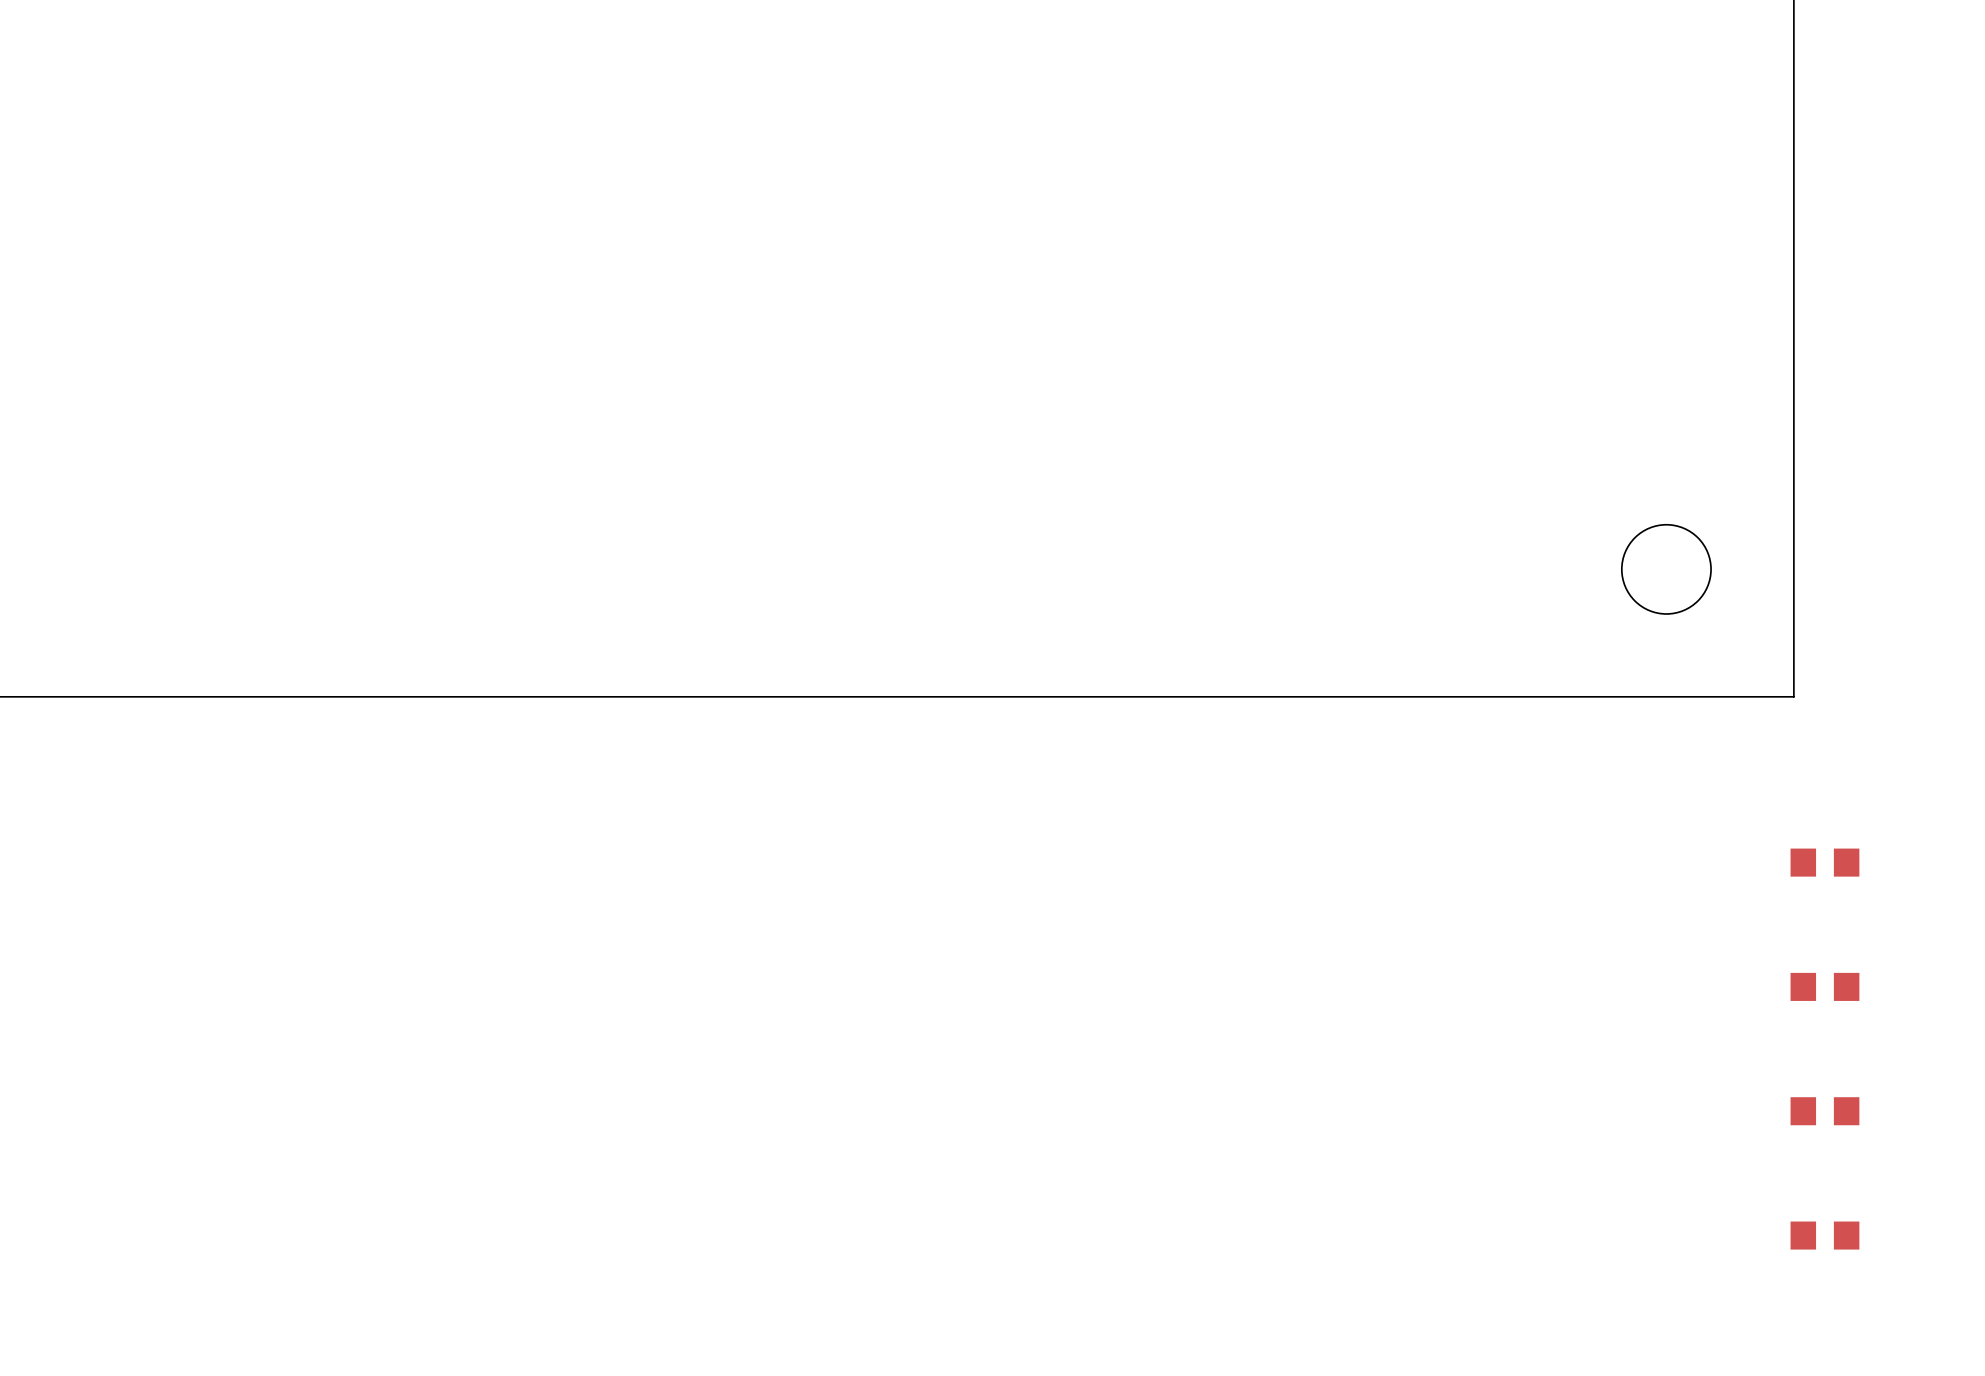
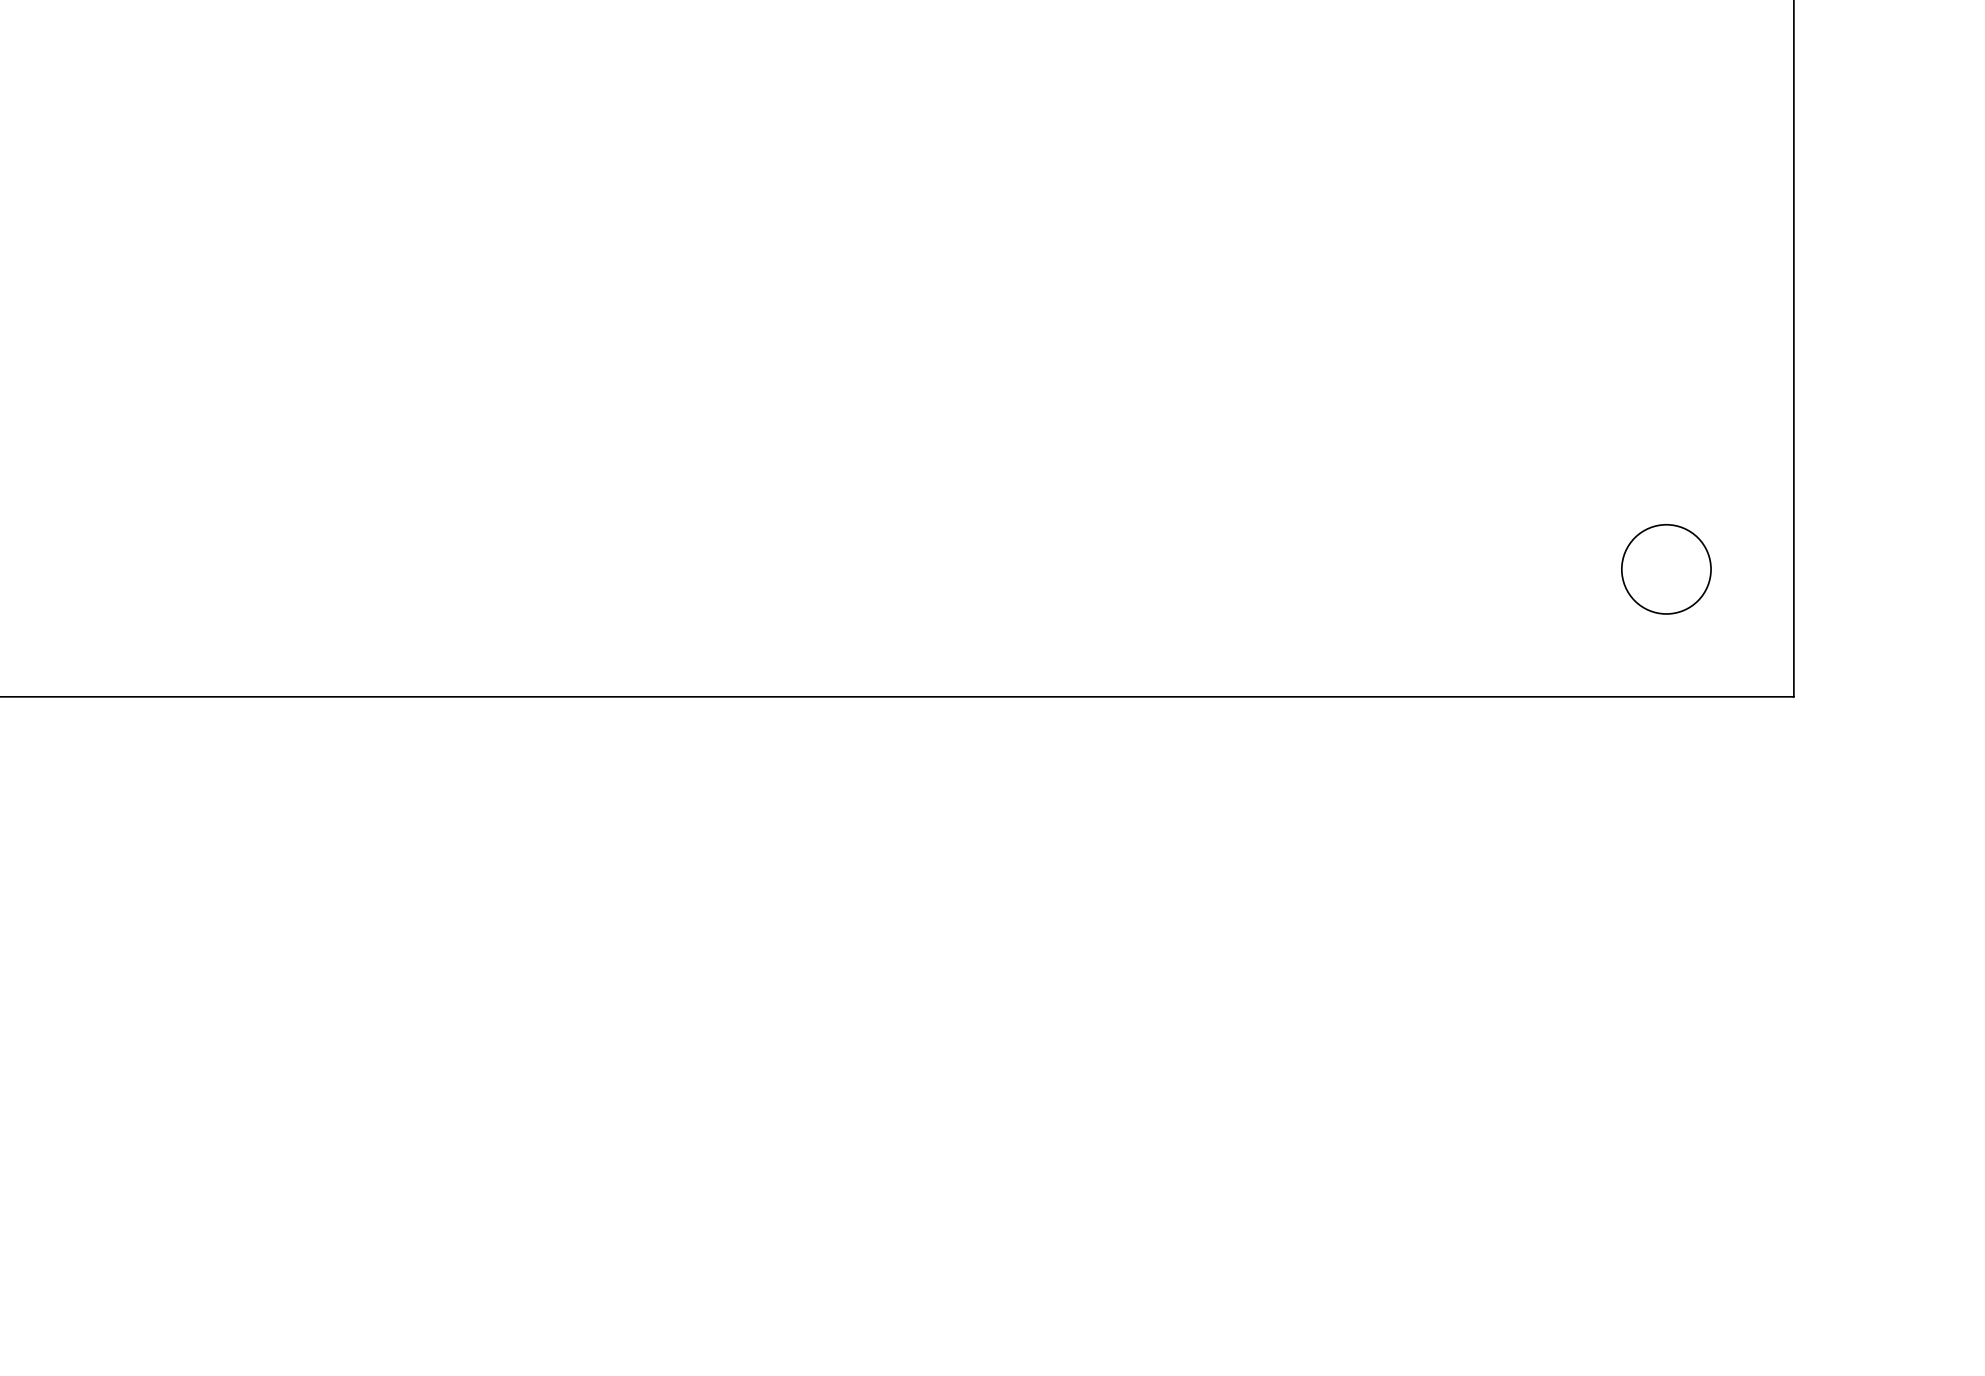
part: (1824, 862) -> none
part: (1824, 986) -> none
part: (1824, 1111) -> none
part: (1824, 1235) -> none

